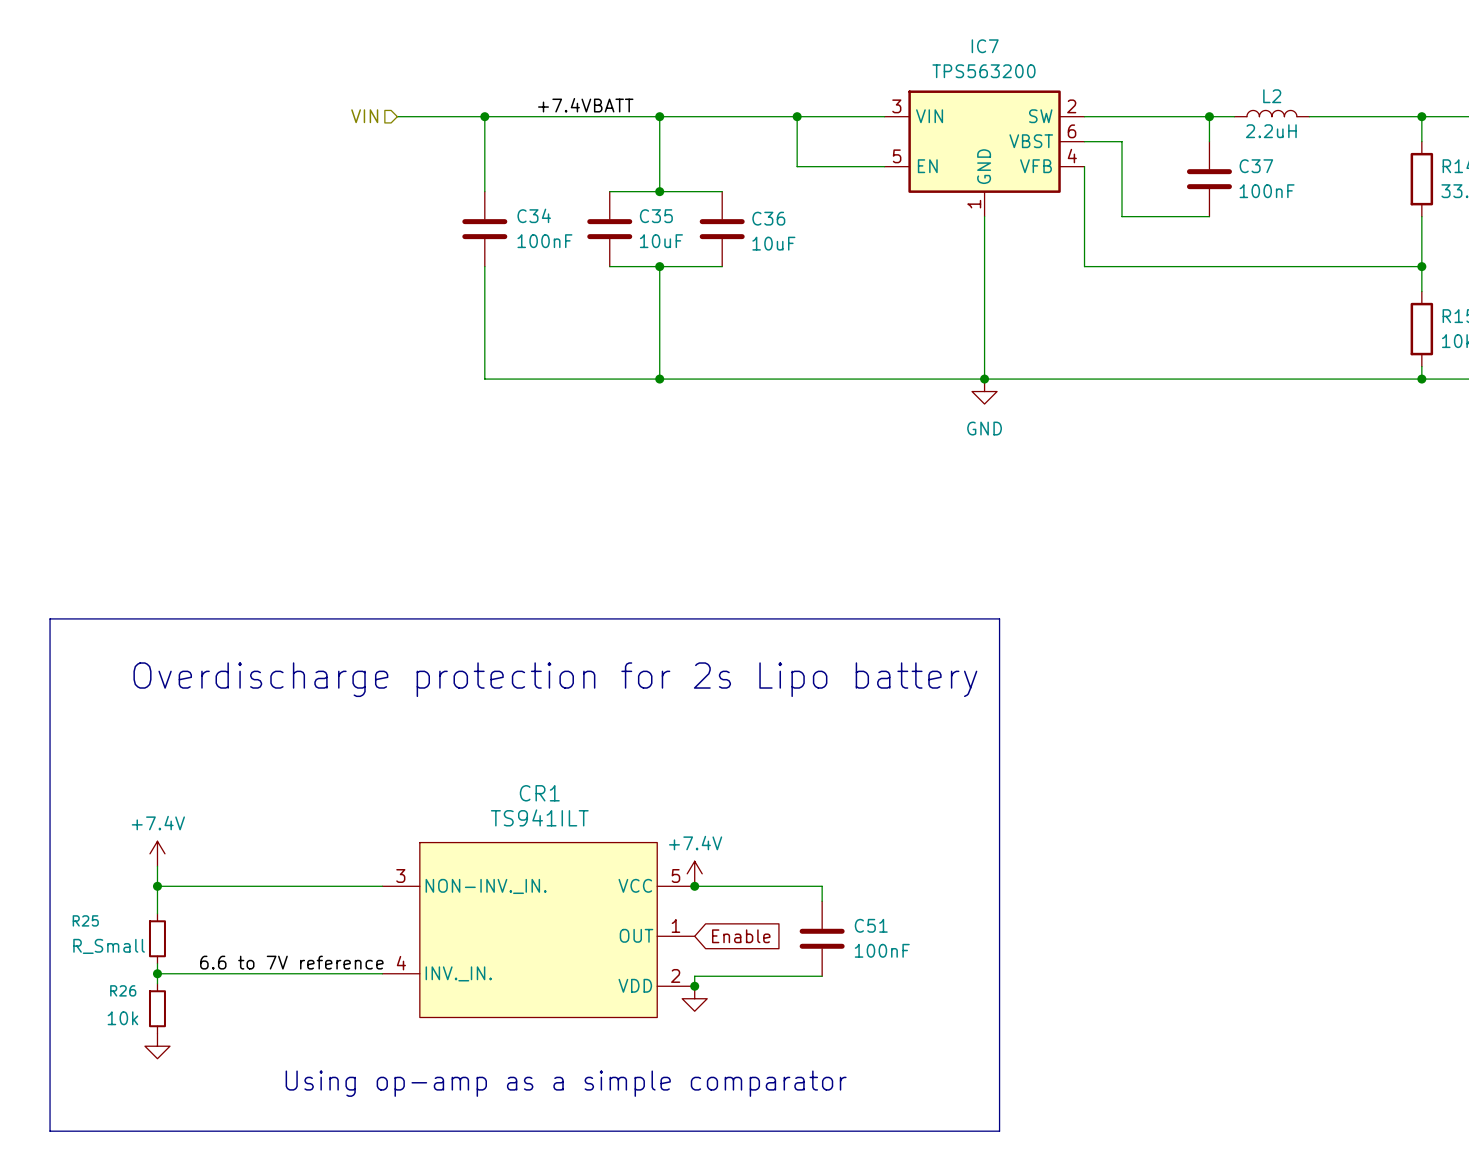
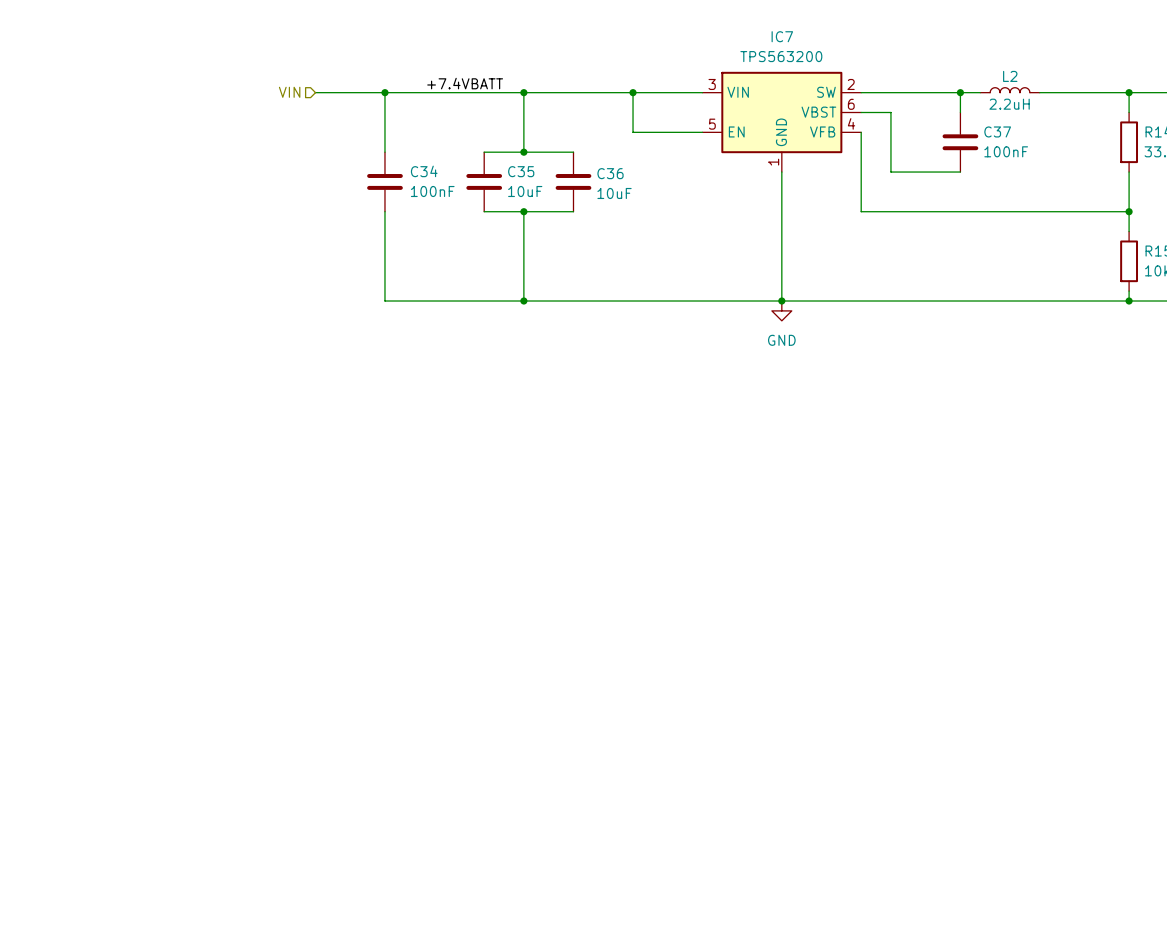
line: (50, 618) (999, 618) (999, 1131) (50, 1131) (50, 618) -> none
text: Overdischarge protection for 2s Lipo battery (555, 679) -> none
power symbol: +7.4V (157, 853) -> none
wire: (157, 866) (157, 913) -> none
power symbol: +7.4V (694, 873) -> none
wire: (157, 886) (382, 886) -> none
junction: (157, 886) -> none
wire: (694, 886) (822, 886) (822, 901) -> none
junction: (694, 886) -> none
CR1: TS941ILT (538, 930) -> none
global label: Enable (741, 936) -> none
R25: R_Small (157, 938) -> none
C51: 100nF (822, 938) -> none
label: 6.6 to 7V reference (291, 962) -> none
wire: (157, 963) (157, 983) -> none
wire: (157, 973) (382, 973) -> none
junction: (157, 973) -> none
wire: (822, 976) (694, 976) (694, 986) -> none
junction: (694, 986) -> none
power symbol: (694, 998) -> none
R26: 10k (157, 1008) -> none
power symbol: (157, 1046) -> none
text: Using op-amp as a simple comparator (566, 1083) -> none

